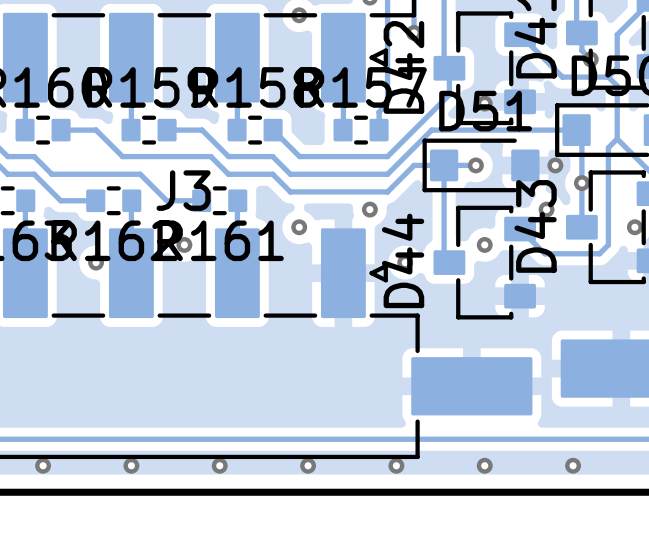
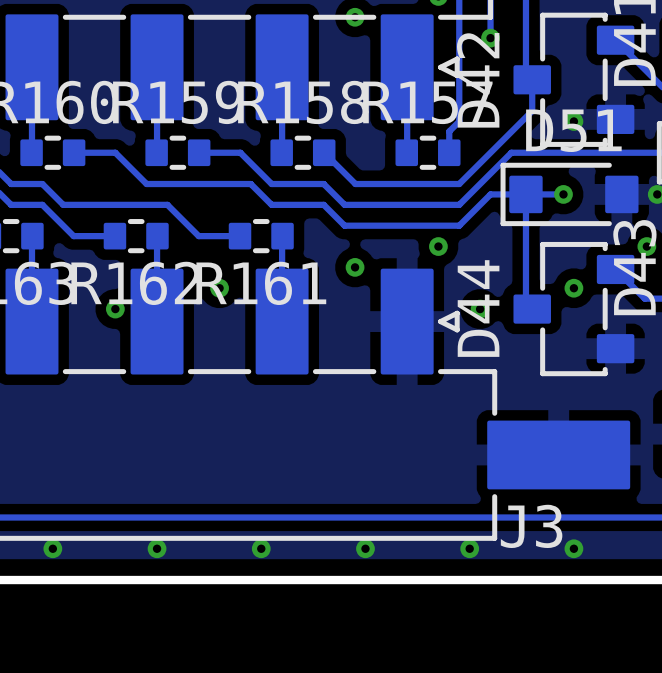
J3 name position: J3 (183, 190) -> J3 (531, 526)

